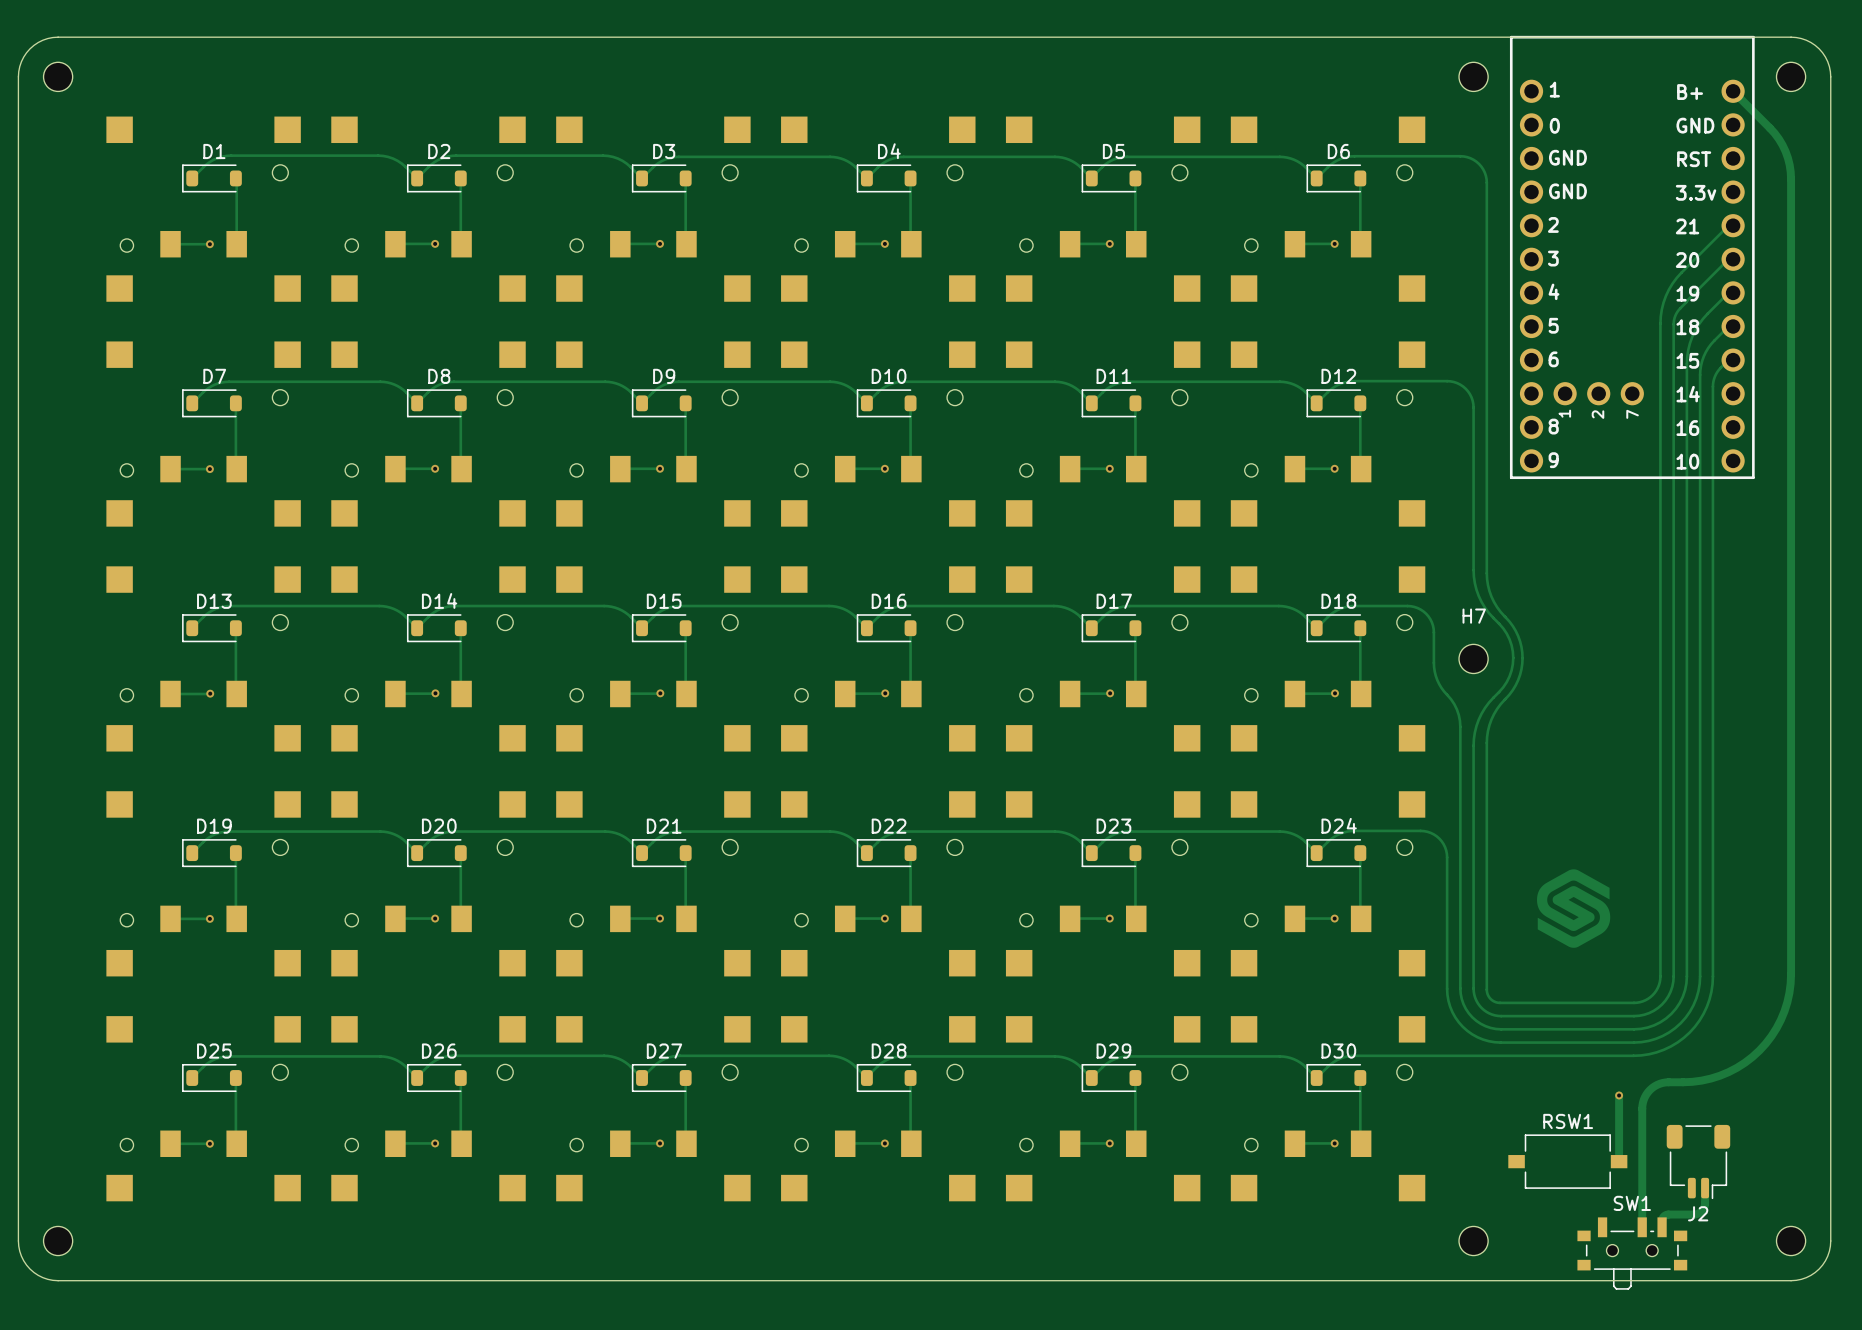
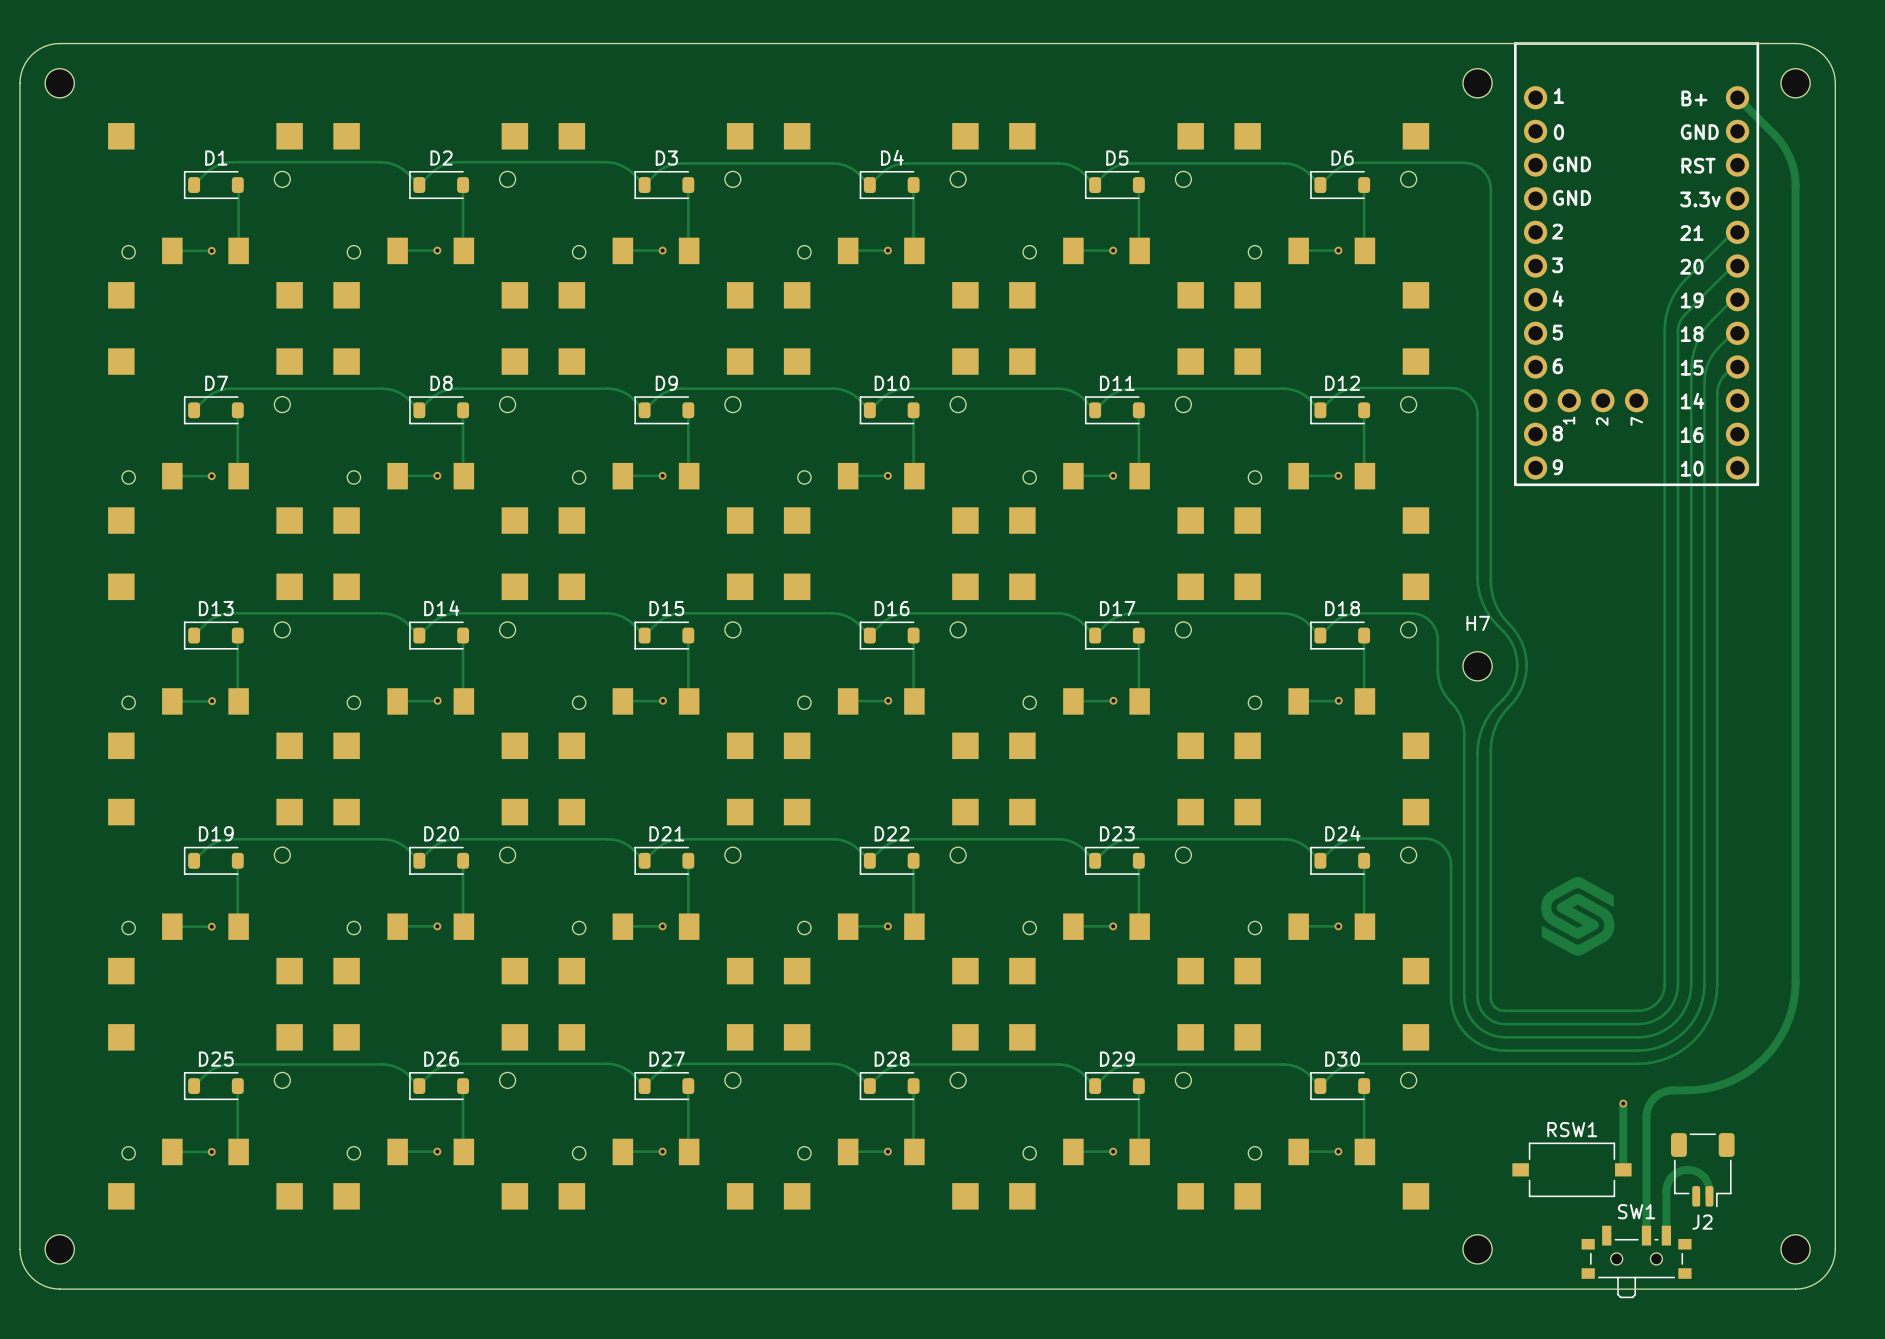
track: (1705, 1188) (1704, 1204) (1700, 1212) (1695, 1214) (1667, 1214) (1662, 1220) -> (1709, 1191) (1706, 1180) (1696, 1171) (1685, 1169) (1674, 1174) (1668, 1182) (1666, 1188) (1666, 1229)

